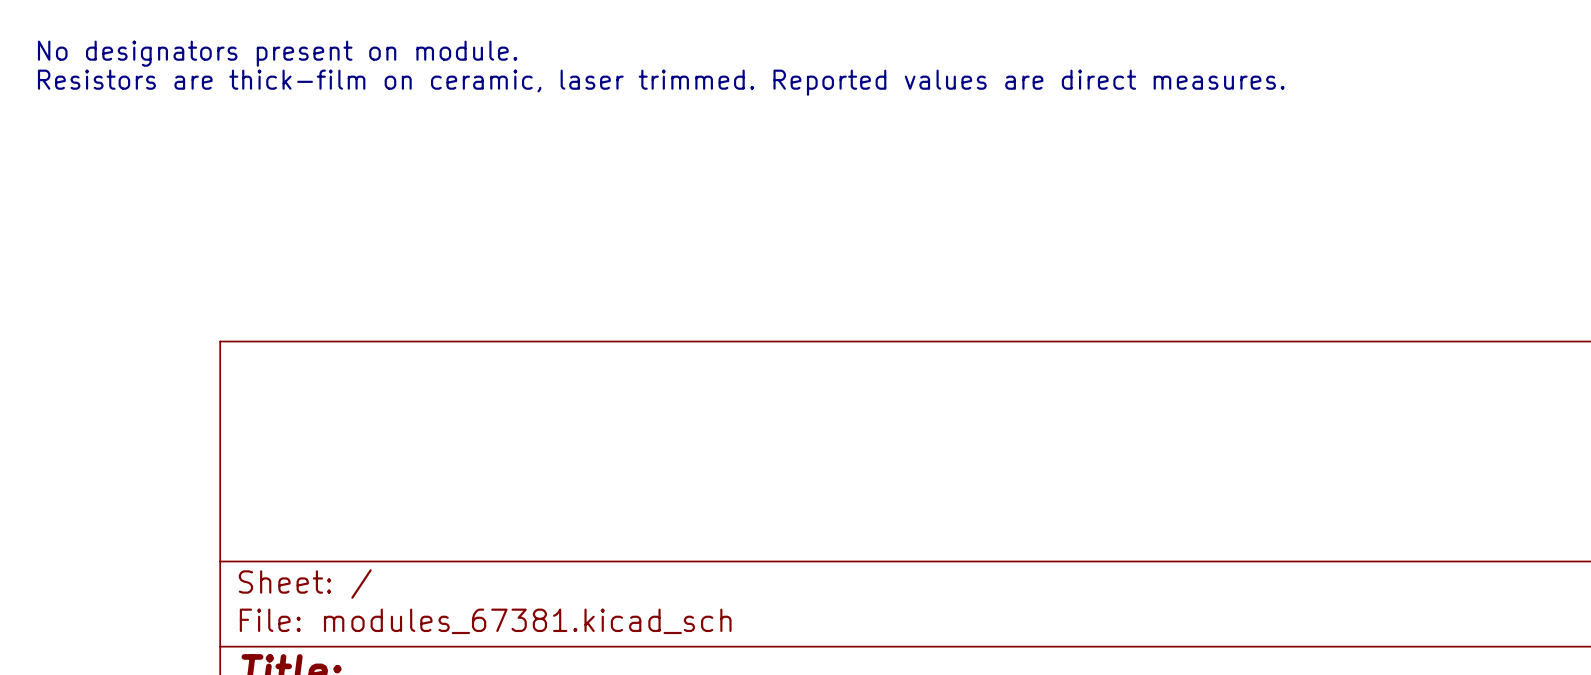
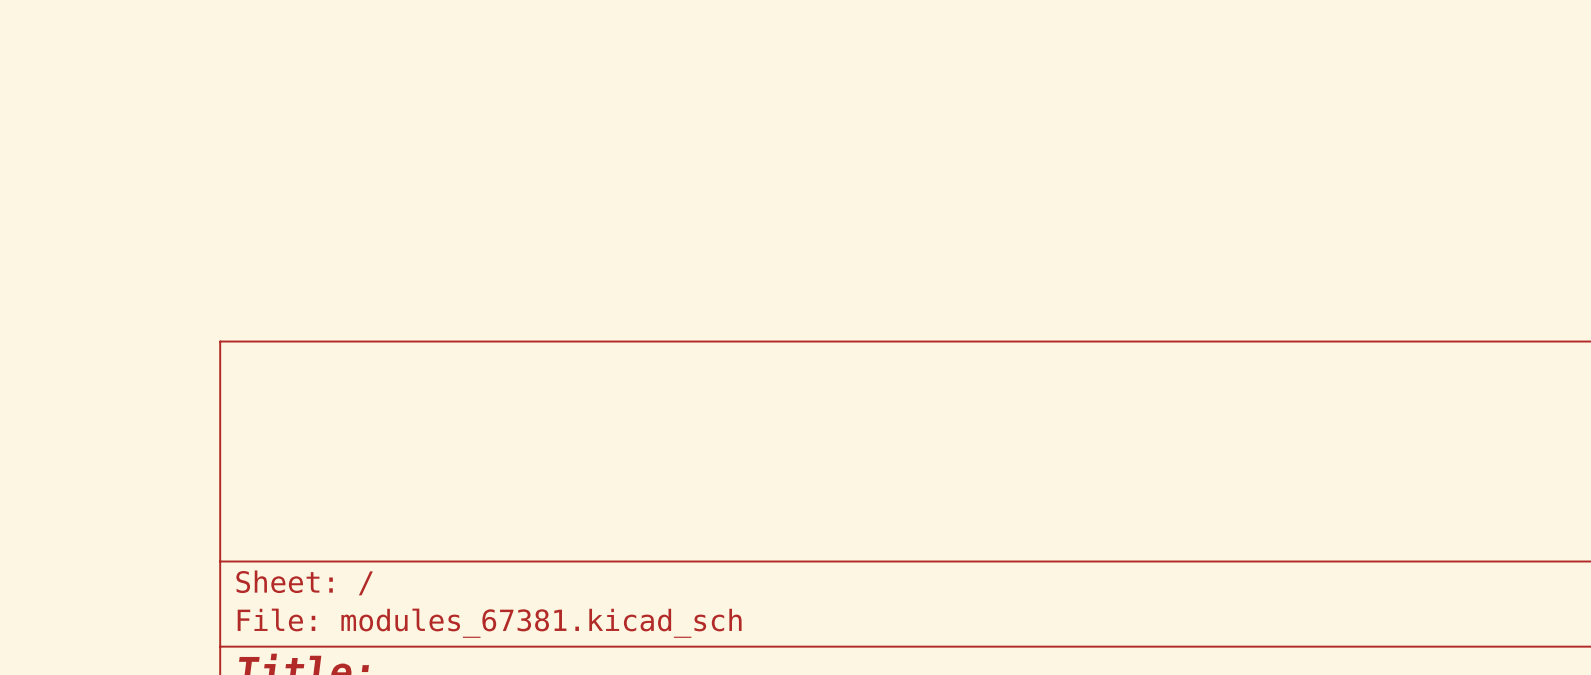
text: No designators present on module. (277, 53) -> none
text: Resistors are thick-film on ceramic, laser trimmed. Reported values are direct measures. (661, 82) -> none

